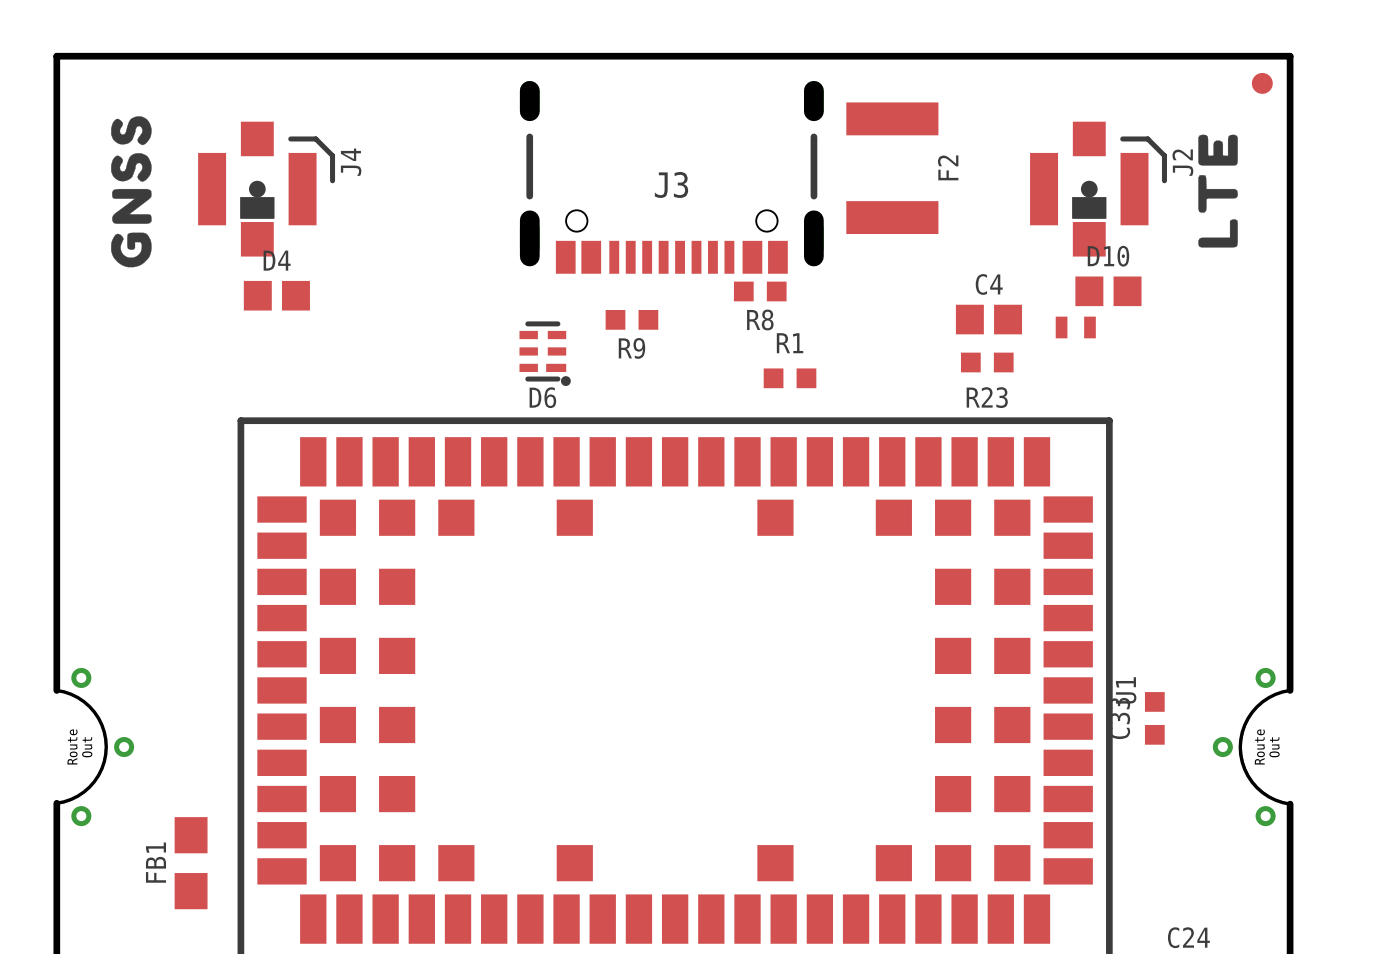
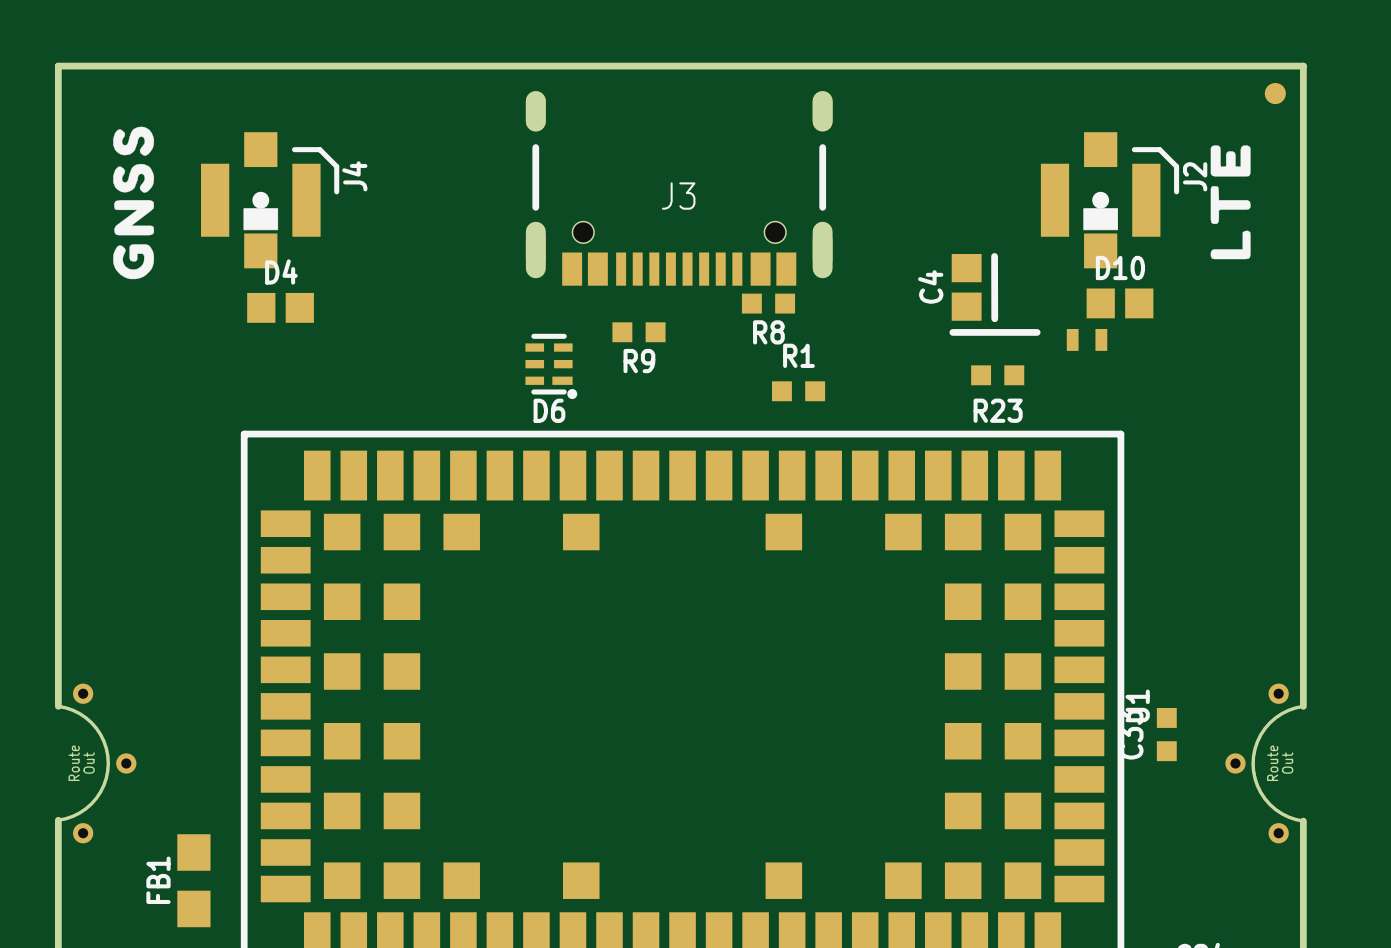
F2: (892, 168) -> none
line: none -> (994, 256) (994, 318)
C4 rotation: 0° (988, 319) -> 90° clockwise (966, 287)
C4 position: (988, 319) -> (966, 287)
line: none -> (952, 332) (1037, 332)

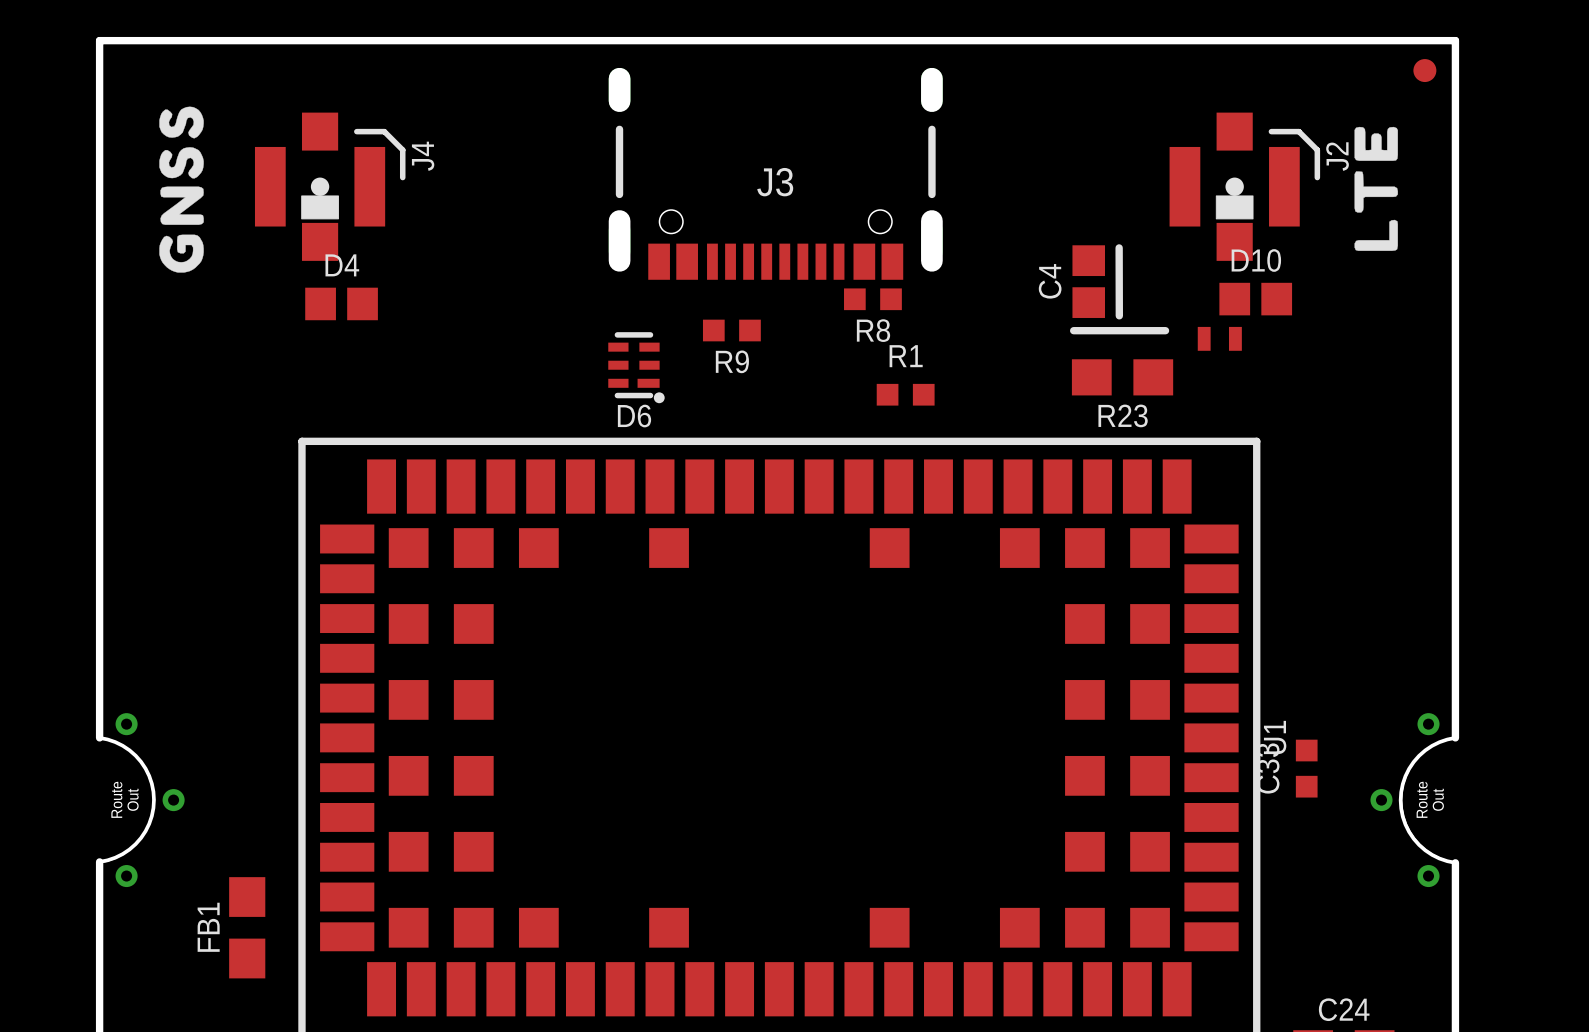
R23 footprint: [971, 365, 1025, 386] -> [1071, 359, 1174, 396]

